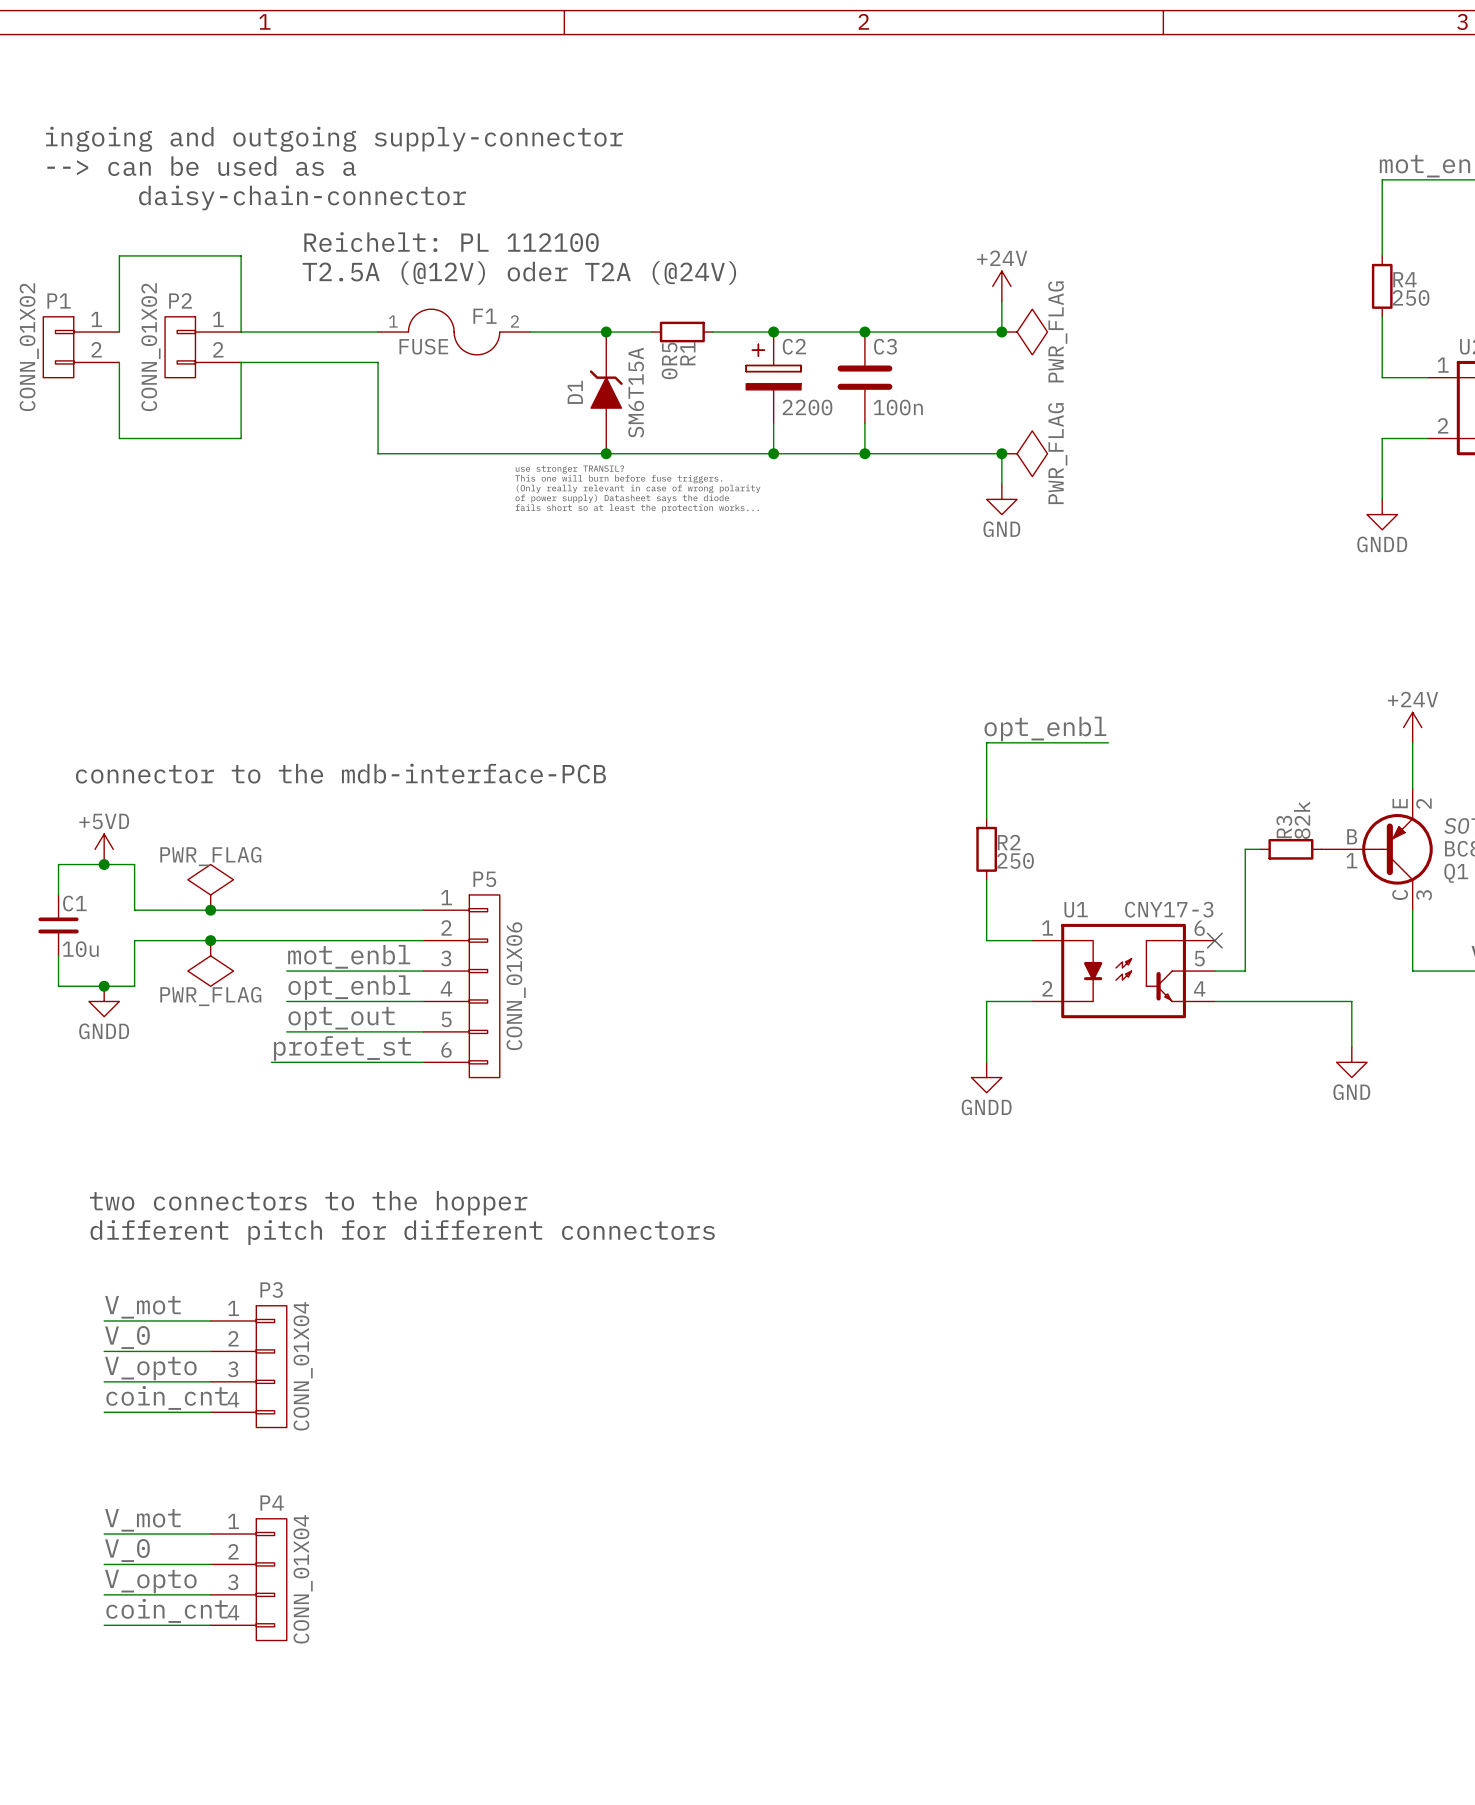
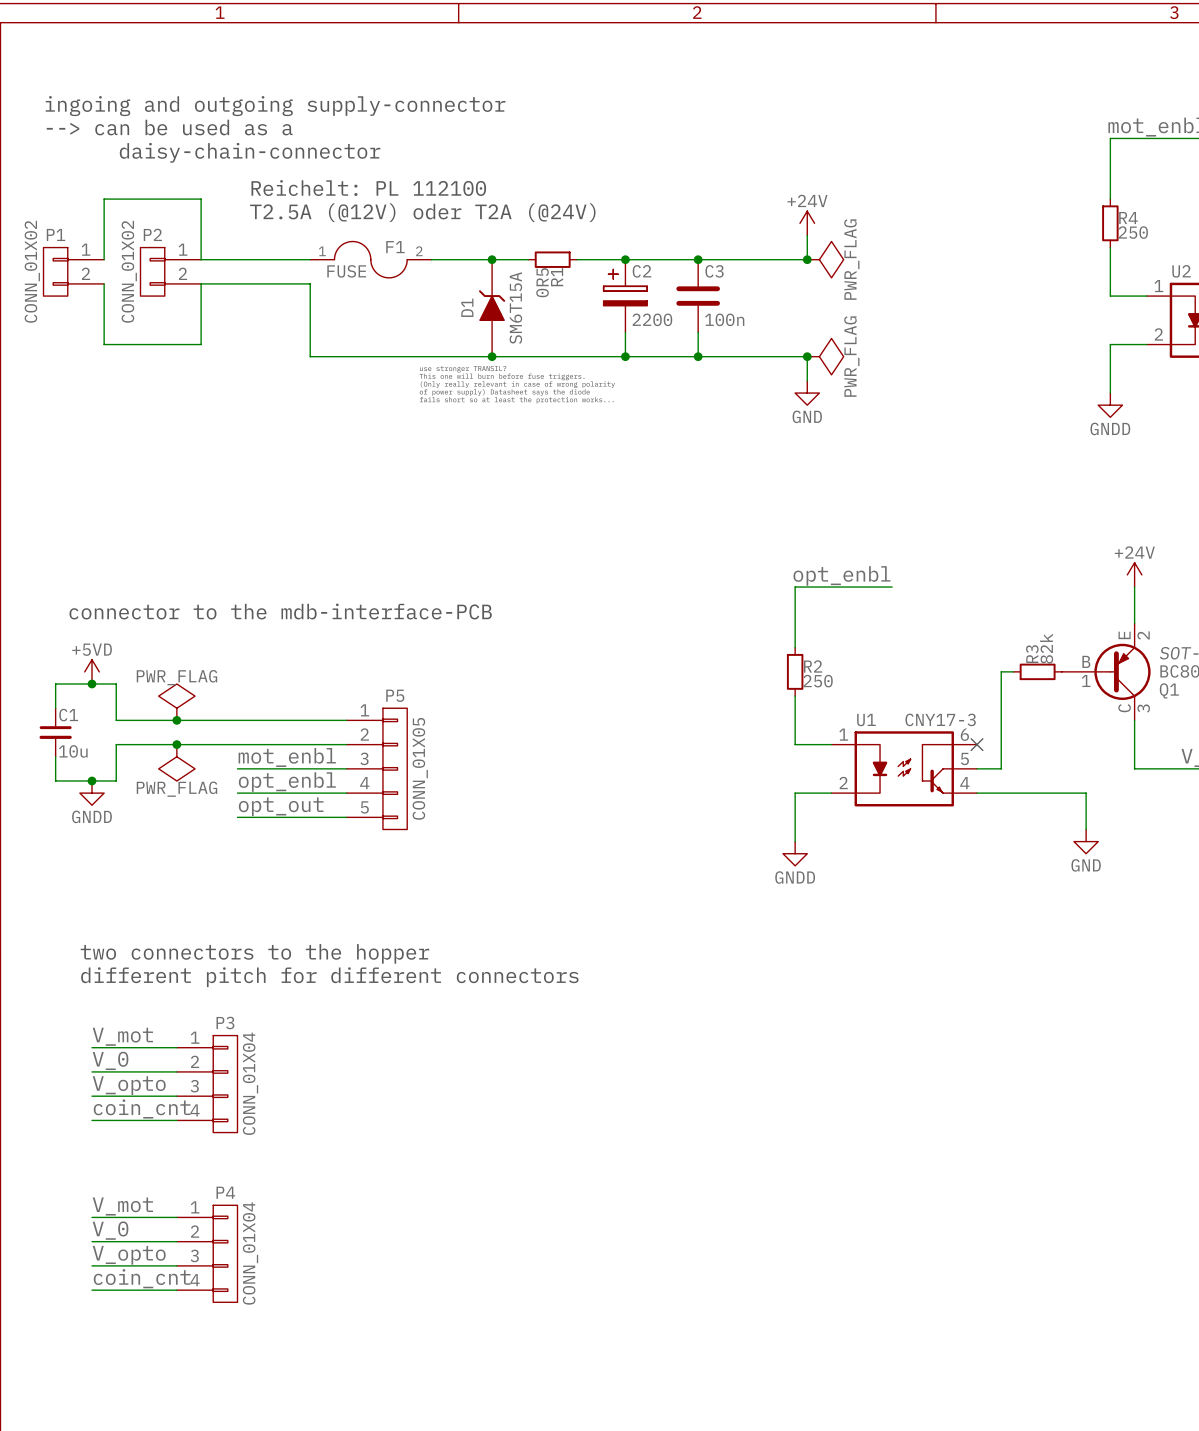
P5 symbol: [423, 894, 500, 1078] -> [346, 708, 408, 830]
P5 value: CONN_01X06 (516, 986) -> CONN_01X05 (420, 768)
label: profet_st (342, 1048) -> none
wire: (271, 1062) (423, 1062) -> none

